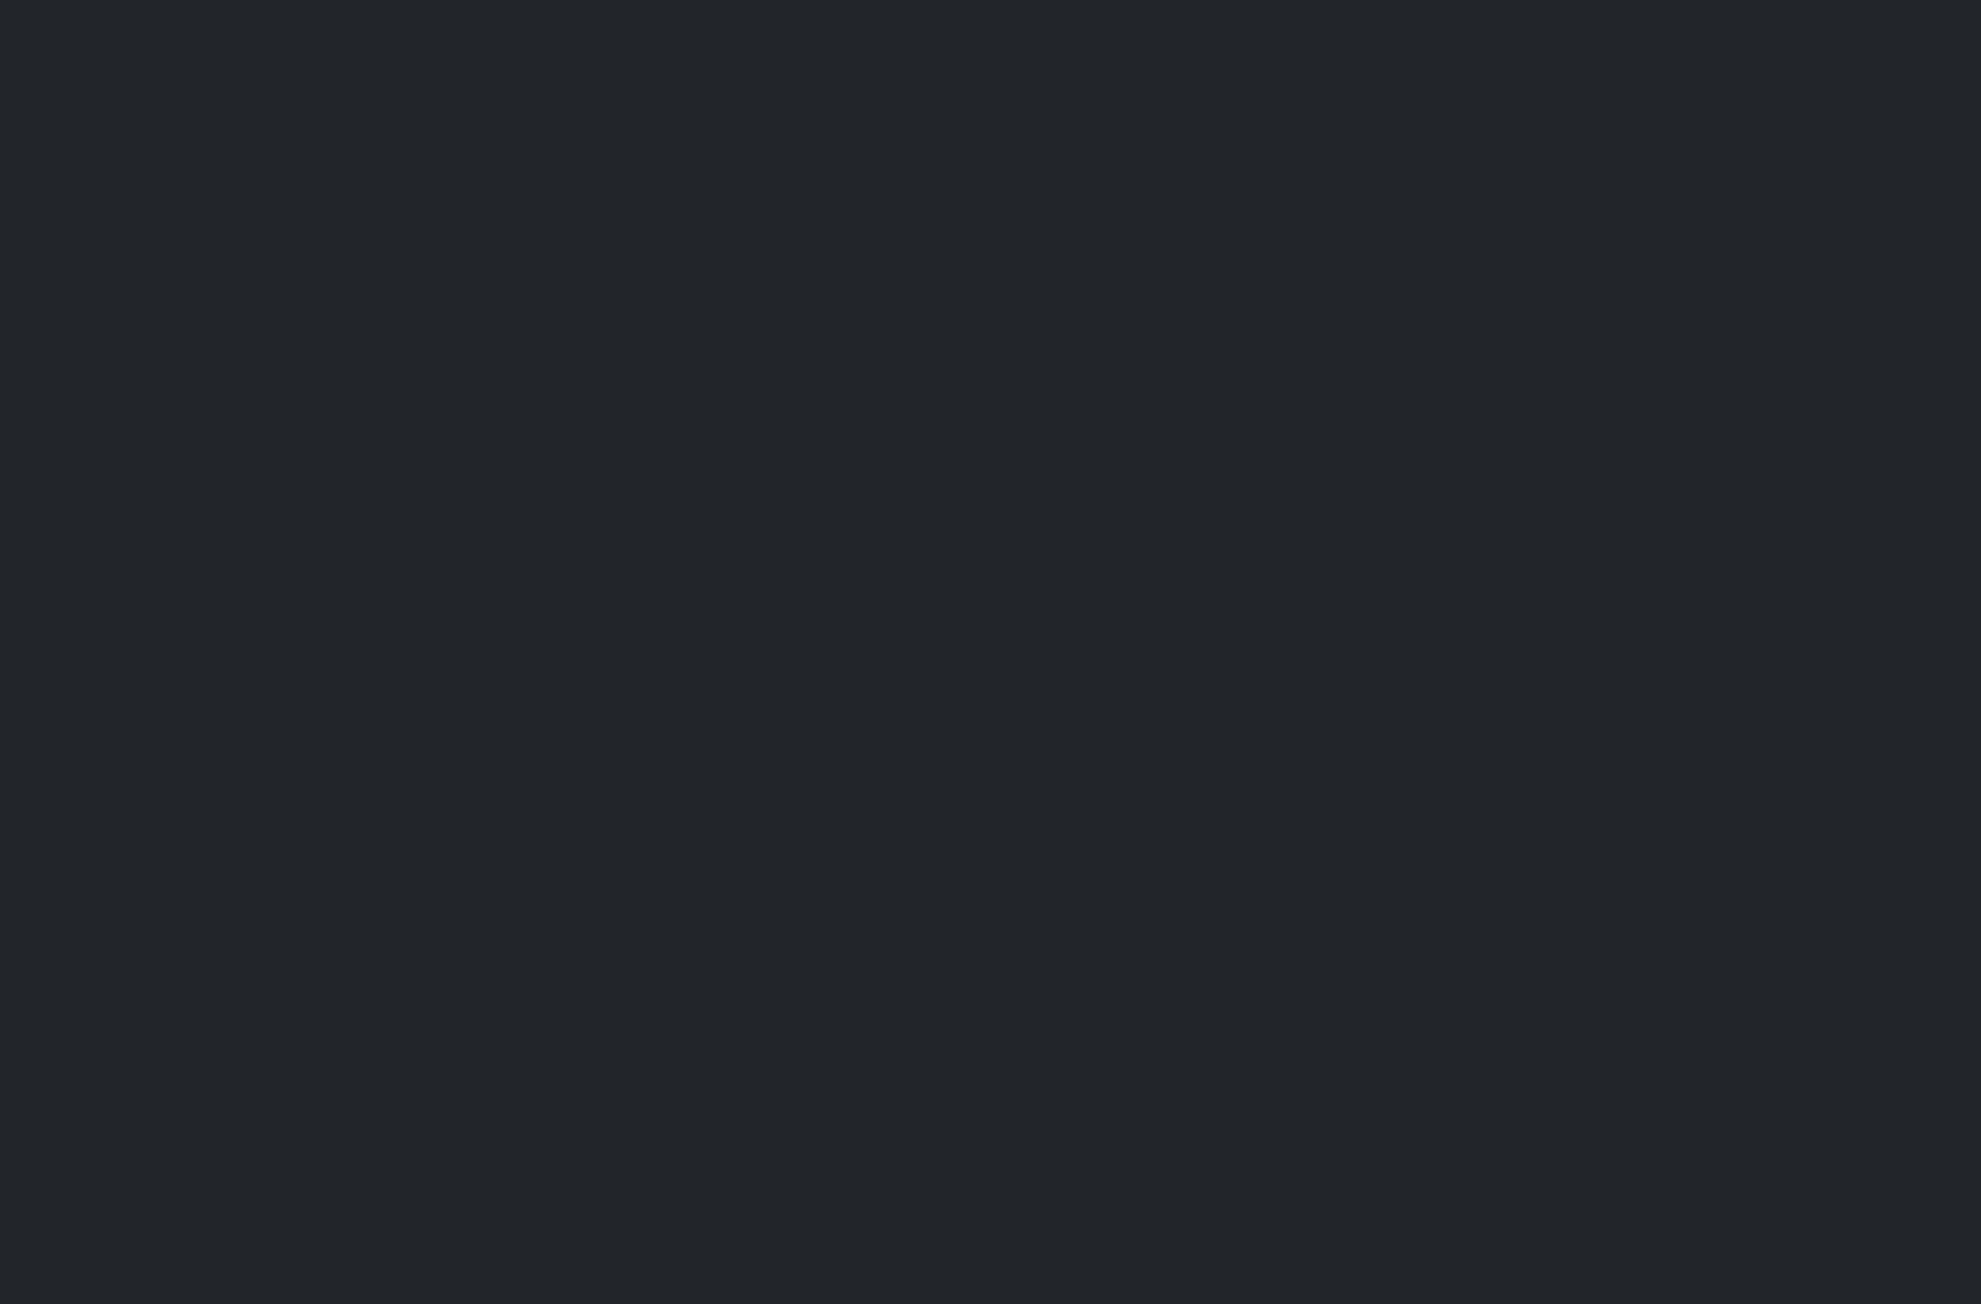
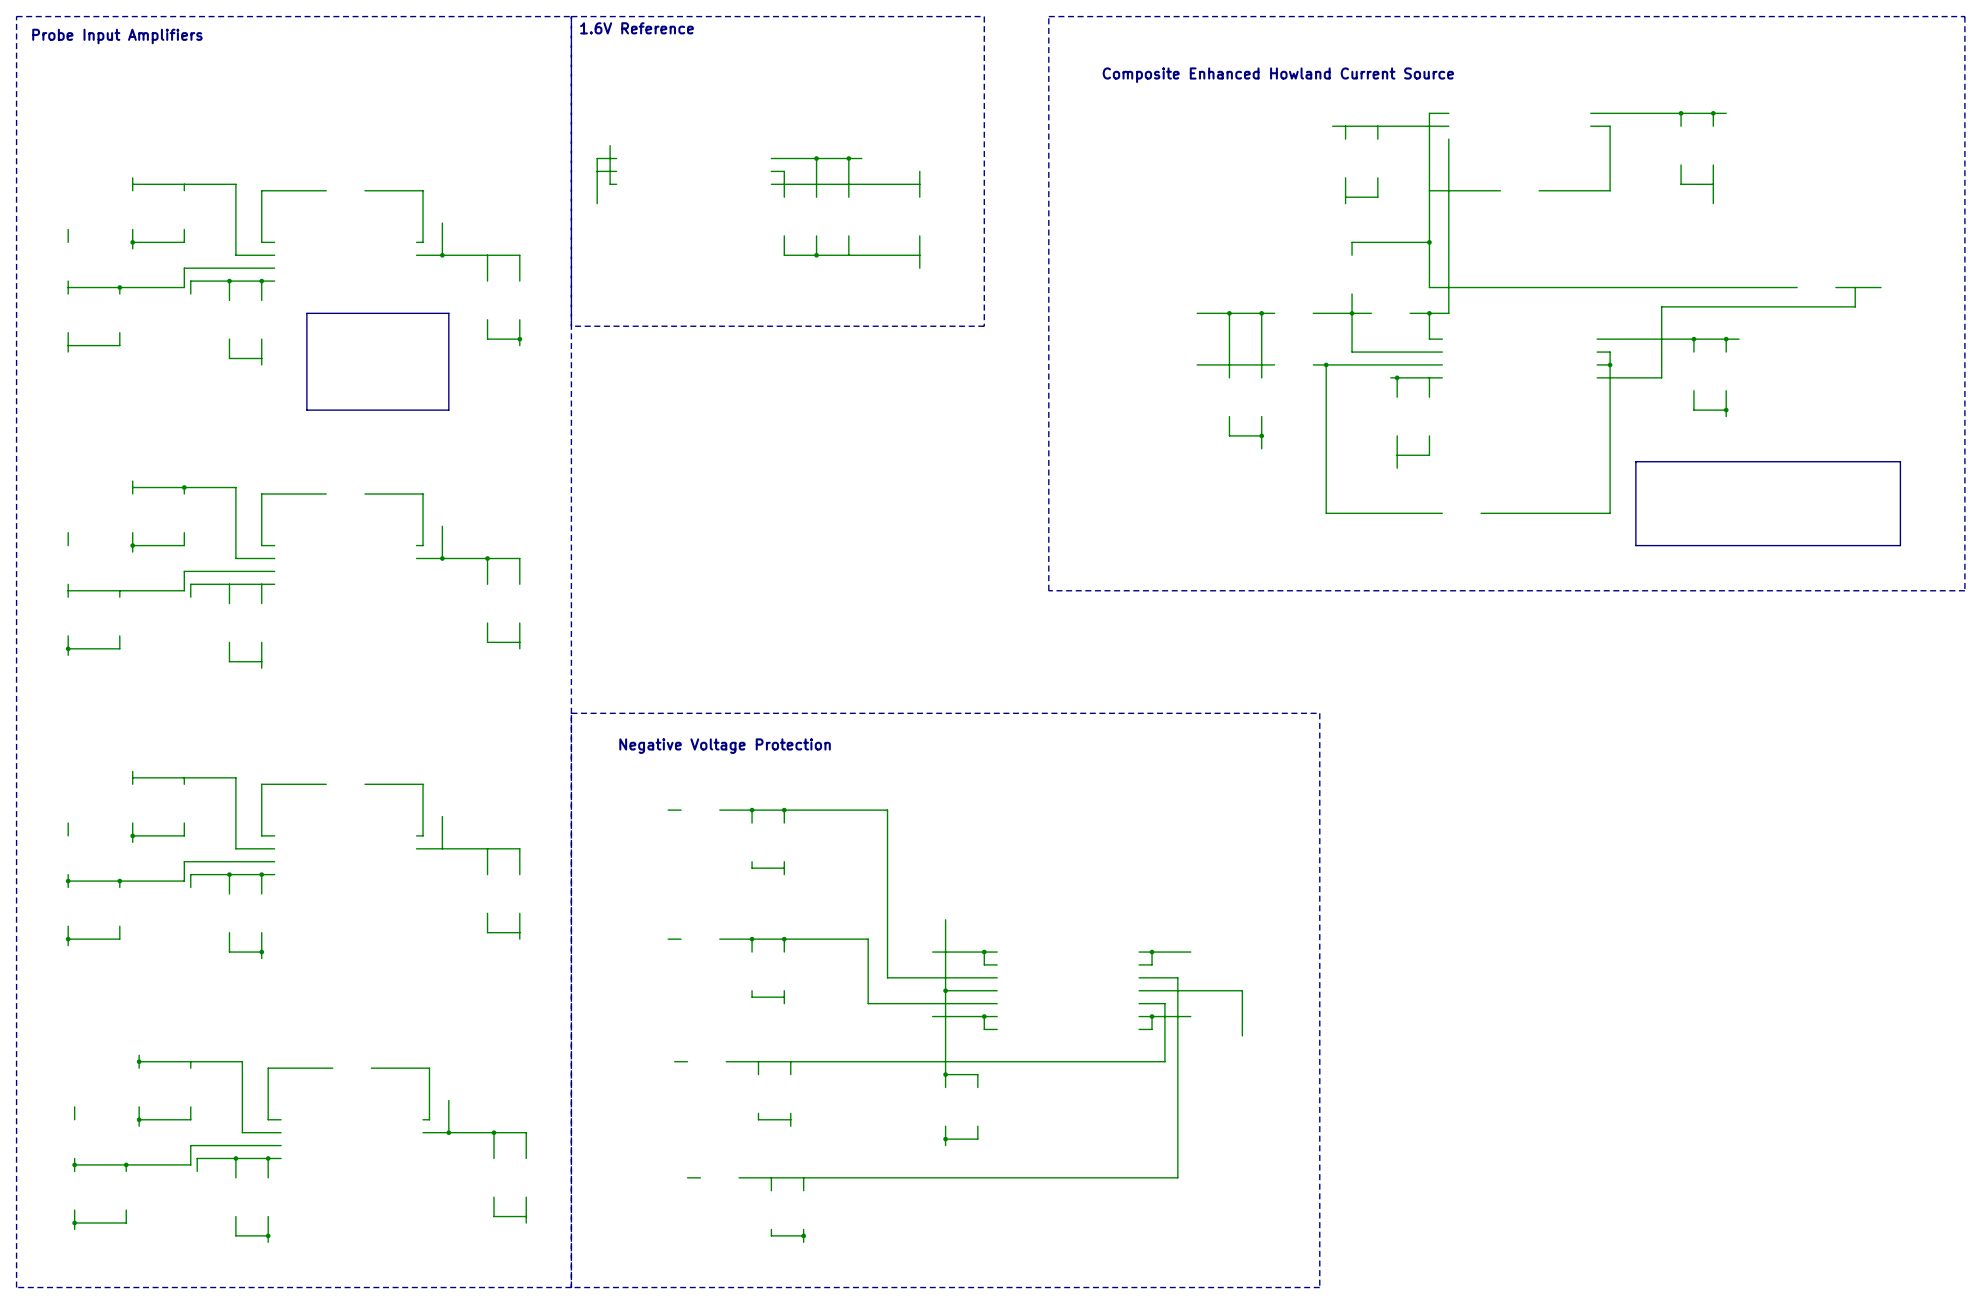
line: none -> (571, 16) (571, 1287)
line: none -> (1048, 16) (1964, 16) (1964, 590) (1048, 590) (1048, 16)
text: none -> 1.6V Reference (637, 28)
text: none -> Probe Input Amplifiers (117, 36)
text: none -> Composite Enhanced Howland Current Source (1278, 75)
wire: none -> (1448, 113) (1429, 113) (1429, 287) (1797, 287)
wire: none -> (1590, 113) (1726, 113)
wire: none -> (1681, 113) (1681, 126)
junction: none -> (1681, 113)
wire: none -> (1713, 113) (1713, 126)
junction: none -> (1713, 113)
wire: none -> (1332, 126) (1448, 126)
wire: none -> (1345, 126) (1345, 139)
wire: none -> (1377, 126) (1377, 139)
wire: none -> (1590, 126) (1610, 126) (1610, 190) (1539, 190)
wire: none -> (1448, 139) (1448, 313) (1410, 313)
wire: none -> (610, 145) (610, 184) (616, 184)
wire: none -> (616, 158) (597, 158) (597, 203)
wire: none -> (771, 158) (861, 158)
wire: none -> (816, 158) (816, 197)
junction: none -> (816, 158)
wire: none -> (848, 158) (848, 197)
junction: none -> (848, 158)
wire: none -> (1681, 164) (1681, 184) (1713, 184)
wire: none -> (1713, 164) (1713, 203)
wire: none -> (597, 171) (616, 171)
wire: none -> (771, 171) (784, 171) (784, 197)
wire: none -> (919, 171) (919, 197)
wire: none -> (132, 177) (132, 190)
wire: none -> (1345, 177) (1345, 203)
wire: none -> (1377, 177) (1377, 197) (1345, 197)
wire: none -> (132, 184) (235, 184) (235, 255) (274, 255)
wire: none -> (184, 184) (184, 190)
wire: none -> (771, 184) (919, 184)
wire: none -> (326, 190) (261, 190) (261, 242) (274, 242)
wire: none -> (364, 190) (423, 190) (423, 242) (416, 242)
wire: none -> (1429, 190) (1500, 190)
wire: none -> (442, 223) (442, 255)
wire: none -> (68, 229) (68, 242)
wire: none -> (132, 229) (132, 248)
wire: none -> (184, 229) (184, 242) (132, 242)
wire: none -> (784, 235) (784, 255) (919, 255)
wire: none -> (816, 235) (816, 255)
wire: none -> (848, 235) (848, 255)
wire: none -> (919, 235) (919, 268)
junction: none -> (132, 242)
wire: none -> (1429, 242) (1352, 242) (1352, 255)
junction: none -> (1429, 242)
wire: none -> (416, 255) (519, 255) (519, 281)
junction: none -> (442, 255)
wire: none -> (487, 255) (487, 281)
junction: none -> (816, 255)
wire: none -> (274, 268) (184, 268) (184, 287) (68, 287)
wire: none -> (68, 281) (68, 293)
wire: none -> (229, 281) (229, 300)
junction: none -> (229, 281)
wire: none -> (261, 281) (261, 300)
junction: none -> (261, 281)
wire: none -> (274, 281) (190, 281) (190, 293)
wire: none -> (119, 287) (119, 293)
junction: none -> (119, 287)
wire: none -> (1835, 287) (1881, 287)
wire: none -> (1855, 287) (1855, 306) (1661, 306) (1661, 377) (1597, 377)
wire: none -> (1352, 293) (1352, 352) (1442, 352)
line: none -> (306, 313) (448, 313) (448, 410) (306, 410) (306, 313)
wire: none -> (1197, 313) (1274, 313)
wire: none -> (1229, 313) (1229, 377)
junction: none -> (1229, 313)
wire: none -> (1261, 313) (1261, 377)
junction: none -> (1261, 313)
wire: none -> (1313, 313) (1371, 313)
junction: none -> (1352, 313)
wire: none -> (1429, 313) (1429, 339) (1442, 339)
junction: none -> (1429, 313)
wire: none -> (487, 319) (487, 339) (519, 339)
wire: none -> (519, 319) (519, 345)
line: none -> (571, 326) (984, 326) (984, 16) (16, 16) (16, 1287) (1319, 1287) (1319, 713) (571, 713)
wire: none -> (68, 332) (68, 352)
wire: none -> (119, 332) (119, 345) (68, 345)
wire: none -> (229, 339) (229, 358) (261, 358)
wire: none -> (261, 339) (261, 364)
junction: none -> (519, 339)
wire: none -> (1597, 339) (1739, 339)
wire: none -> (1693, 339) (1693, 352)
junction: none -> (1693, 339)
wire: none -> (1726, 339) (1726, 352)
junction: none -> (1726, 339)
wire: none -> (1597, 352) (1610, 352) (1610, 513) (1481, 513)
wire: none -> (1197, 364) (1274, 364)
wire: none -> (1313, 364) (1442, 364)
wire: none -> (1326, 364) (1326, 513) (1442, 513)
junction: none -> (1326, 364)
wire: none -> (1597, 364) (1610, 364)
junction: none -> (1610, 364)
wire: none -> (1390, 377) (1442, 377)
wire: none -> (1397, 377) (1397, 397)
junction: none -> (1397, 377)
wire: none -> (1429, 377) (1429, 397)
wire: none -> (1693, 390) (1693, 410) (1726, 410)
wire: none -> (1726, 390) (1726, 416)
junction: none -> (1726, 410)
wire: none -> (1229, 416) (1229, 435) (1261, 435)
wire: none -> (1261, 416) (1261, 448)
junction: none -> (1261, 435)
wire: none -> (1397, 435) (1397, 468)
wire: none -> (1429, 435) (1429, 455) (1397, 455)
line: none -> (1635, 461) (1900, 461) (1900, 545) (1635, 545) (1635, 461)
wire: none -> (132, 481) (132, 493)
wire: none -> (132, 487) (235, 487) (235, 558) (274, 558)
wire: none -> (184, 487) (184, 493)
junction: none -> (184, 487)
wire: none -> (326, 493) (261, 493) (261, 545) (274, 545)
wire: none -> (364, 493) (423, 493) (423, 545) (416, 545)
wire: none -> (442, 526) (442, 558)
wire: none -> (68, 532) (68, 545)
wire: none -> (132, 532) (132, 552)
wire: none -> (184, 532) (184, 545) (132, 545)
junction: none -> (132, 545)
wire: none -> (416, 558) (519, 558) (519, 584)
junction: none -> (442, 558)
wire: none -> (487, 558) (487, 584)
junction: none -> (487, 558)
wire: none -> (274, 571) (184, 571) (184, 590) (68, 590)
wire: none -> (68, 584) (68, 597)
wire: none -> (229, 584) (229, 603)
wire: none -> (261, 584) (261, 603)
wire: none -> (274, 584) (190, 584) (190, 597)
wire: none -> (119, 590) (119, 597)
wire: none -> (487, 623) (487, 642) (519, 642)
wire: none -> (519, 623) (519, 648)
wire: none -> (68, 635) (68, 655)
wire: none -> (119, 635) (119, 648) (68, 648)
wire: none -> (229, 642) (229, 661) (261, 661)
wire: none -> (261, 642) (261, 668)
junction: none -> (68, 648)
text: none -> Negative Voltage Protection (725, 746)
wire: none -> (132, 771) (132, 784)
wire: none -> (132, 777) (235, 777) (235, 848) (274, 848)
wire: none -> (184, 777) (184, 784)
wire: none -> (326, 784) (261, 784) (261, 835) (274, 835)
wire: none -> (364, 784) (423, 784) (423, 835) (416, 835)
wire: none -> (668, 810) (681, 810)
wire: none -> (719, 810) (887, 810) (887, 977) (997, 977)
wire: none -> (752, 810) (752, 823)
junction: none -> (752, 810)
wire: none -> (784, 810) (784, 823)
junction: none -> (784, 810)
wire: none -> (442, 816) (442, 848)
wire: none -> (68, 823) (68, 835)
wire: none -> (132, 823) (132, 842)
wire: none -> (184, 823) (184, 835) (132, 835)
junction: none -> (132, 835)
wire: none -> (416, 848) (519, 848) (519, 874)
wire: none -> (487, 848) (487, 874)
wire: none -> (274, 861) (184, 861) (184, 881) (68, 881)
wire: none -> (752, 861) (752, 868) (784, 868)
wire: none -> (784, 861) (784, 874)
wire: none -> (68, 874) (68, 887)
wire: none -> (229, 874) (229, 893)
junction: none -> (229, 874)
wire: none -> (261, 874) (261, 893)
junction: none -> (261, 874)
wire: none -> (274, 874) (190, 874) (190, 887)
junction: none -> (68, 881)
wire: none -> (119, 881) (119, 887)
junction: none -> (119, 881)
wire: none -> (487, 913) (487, 932) (519, 932)
wire: none -> (519, 913) (519, 939)
wire: none -> (945, 919) (945, 1087)
wire: none -> (68, 926) (68, 945)
wire: none -> (119, 926) (119, 939) (68, 939)
wire: none -> (229, 932) (229, 952) (261, 952)
wire: none -> (261, 932) (261, 958)
junction: none -> (68, 939)
wire: none -> (668, 939) (681, 939)
wire: none -> (719, 939) (868, 939) (868, 1003) (997, 1003)
wire: none -> (752, 939) (752, 952)
junction: none -> (752, 939)
wire: none -> (784, 939) (784, 952)
junction: none -> (784, 939)
junction: none -> (261, 952)
wire: none -> (932, 952) (997, 952)
wire: none -> (984, 952) (984, 964) (997, 964)
junction: none -> (984, 952)
wire: none -> (1139, 952) (1190, 952)
wire: none -> (1152, 952) (1152, 964) (1139, 964)
junction: none -> (1152, 952)
wire: none -> (1139, 977) (1177, 977) (1177, 1177) (739, 1177)
wire: none -> (752, 990) (752, 997) (784, 997)
wire: none -> (784, 990) (784, 1003)
wire: none -> (945, 990) (997, 990)
junction: none -> (945, 990)
wire: none -> (1139, 990) (1242, 990) (1242, 1035)
wire: none -> (1139, 1003) (1164, 1003) (1164, 1061) (726, 1061)
wire: none -> (932, 1016) (997, 1016)
wire: none -> (984, 1016) (984, 1029) (997, 1029)
junction: none -> (984, 1016)
wire: none -> (1139, 1016) (1190, 1016)
wire: none -> (1152, 1016) (1152, 1029) (1139, 1029)
junction: none -> (1152, 1016)
wire: none -> (139, 1055) (139, 1068)
wire: none -> (139, 1061) (242, 1061) (242, 1132) (281, 1132)
junction: none -> (139, 1061)
wire: none -> (190, 1061) (190, 1068)
wire: none -> (674, 1061) (687, 1061)
wire: none -> (758, 1061) (758, 1074)
wire: none -> (790, 1061) (790, 1074)
wire: none -> (332, 1068) (268, 1068) (268, 1119) (281, 1119)
wire: none -> (371, 1068) (429, 1068) (429, 1119) (423, 1119)
wire: none -> (945, 1074) (977, 1074) (977, 1087)
junction: none -> (945, 1074)
wire: none -> (448, 1100) (448, 1132)
wire: none -> (74, 1106) (74, 1119)
wire: none -> (139, 1106) (139, 1126)
wire: none -> (190, 1106) (190, 1119) (139, 1119)
wire: none -> (758, 1113) (758, 1119) (790, 1119)
wire: none -> (790, 1113) (790, 1126)
junction: none -> (139, 1119)
wire: none -> (945, 1126) (945, 1145)
wire: none -> (977, 1126) (977, 1139) (945, 1139)
wire: none -> (423, 1132) (526, 1132) (526, 1158)
junction: none -> (448, 1132)
wire: none -> (493, 1132) (493, 1158)
junction: none -> (493, 1132)
junction: none -> (945, 1139)
wire: none -> (281, 1145) (190, 1145) (190, 1164) (74, 1164)
wire: none -> (74, 1158) (74, 1171)
wire: none -> (235, 1158) (235, 1177)
junction: none -> (235, 1158)
wire: none -> (268, 1158) (268, 1177)
junction: none -> (268, 1158)
wire: none -> (281, 1158) (197, 1158) (197, 1171)
junction: none -> (74, 1164)
wire: none -> (126, 1164) (126, 1171)
junction: none -> (126, 1164)
wire: none -> (687, 1177) (700, 1177)
wire: none -> (771, 1177) (771, 1190)
wire: none -> (803, 1177) (803, 1190)
wire: none -> (493, 1197) (493, 1216) (526, 1216)
wire: none -> (526, 1197) (526, 1223)
wire: none -> (74, 1210) (74, 1229)
wire: none -> (126, 1210) (126, 1223) (74, 1223)
wire: none -> (235, 1216) (235, 1235) (268, 1235)
wire: none -> (268, 1216) (268, 1242)
junction: none -> (74, 1223)
wire: none -> (771, 1229) (771, 1235) (803, 1235)
wire: none -> (803, 1229) (803, 1242)
junction: none -> (268, 1235)
junction: none -> (803, 1235)

